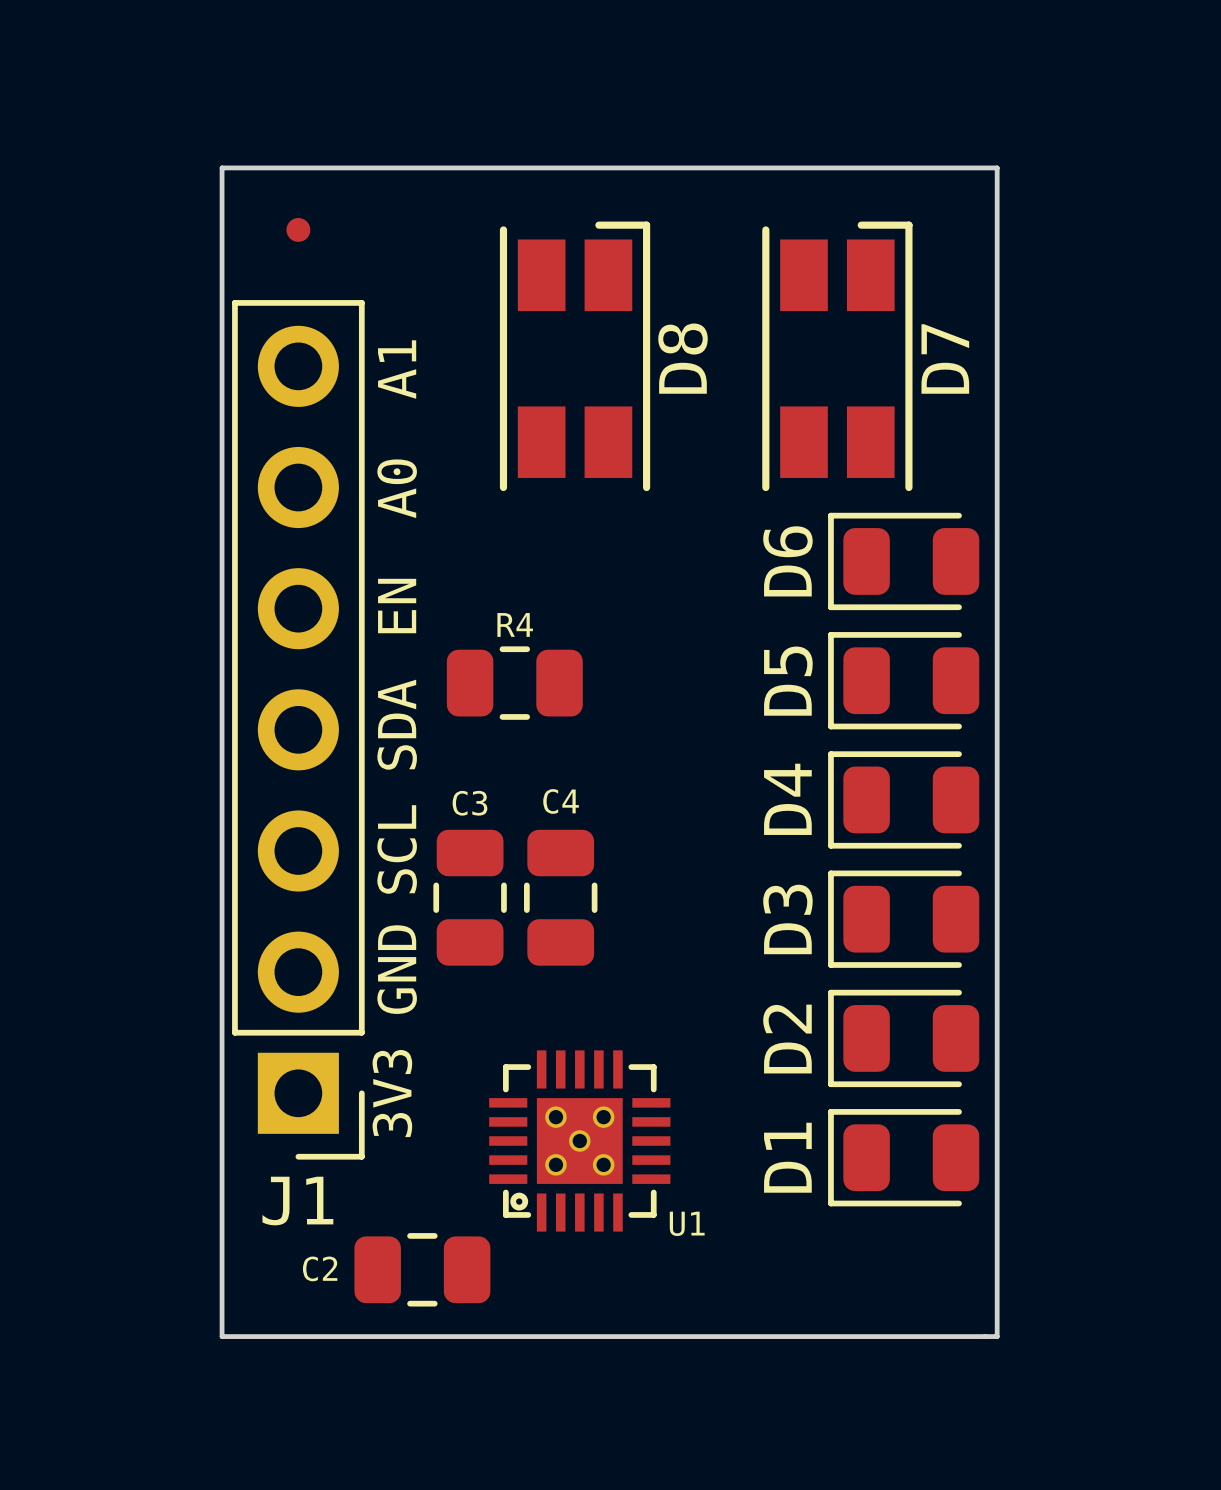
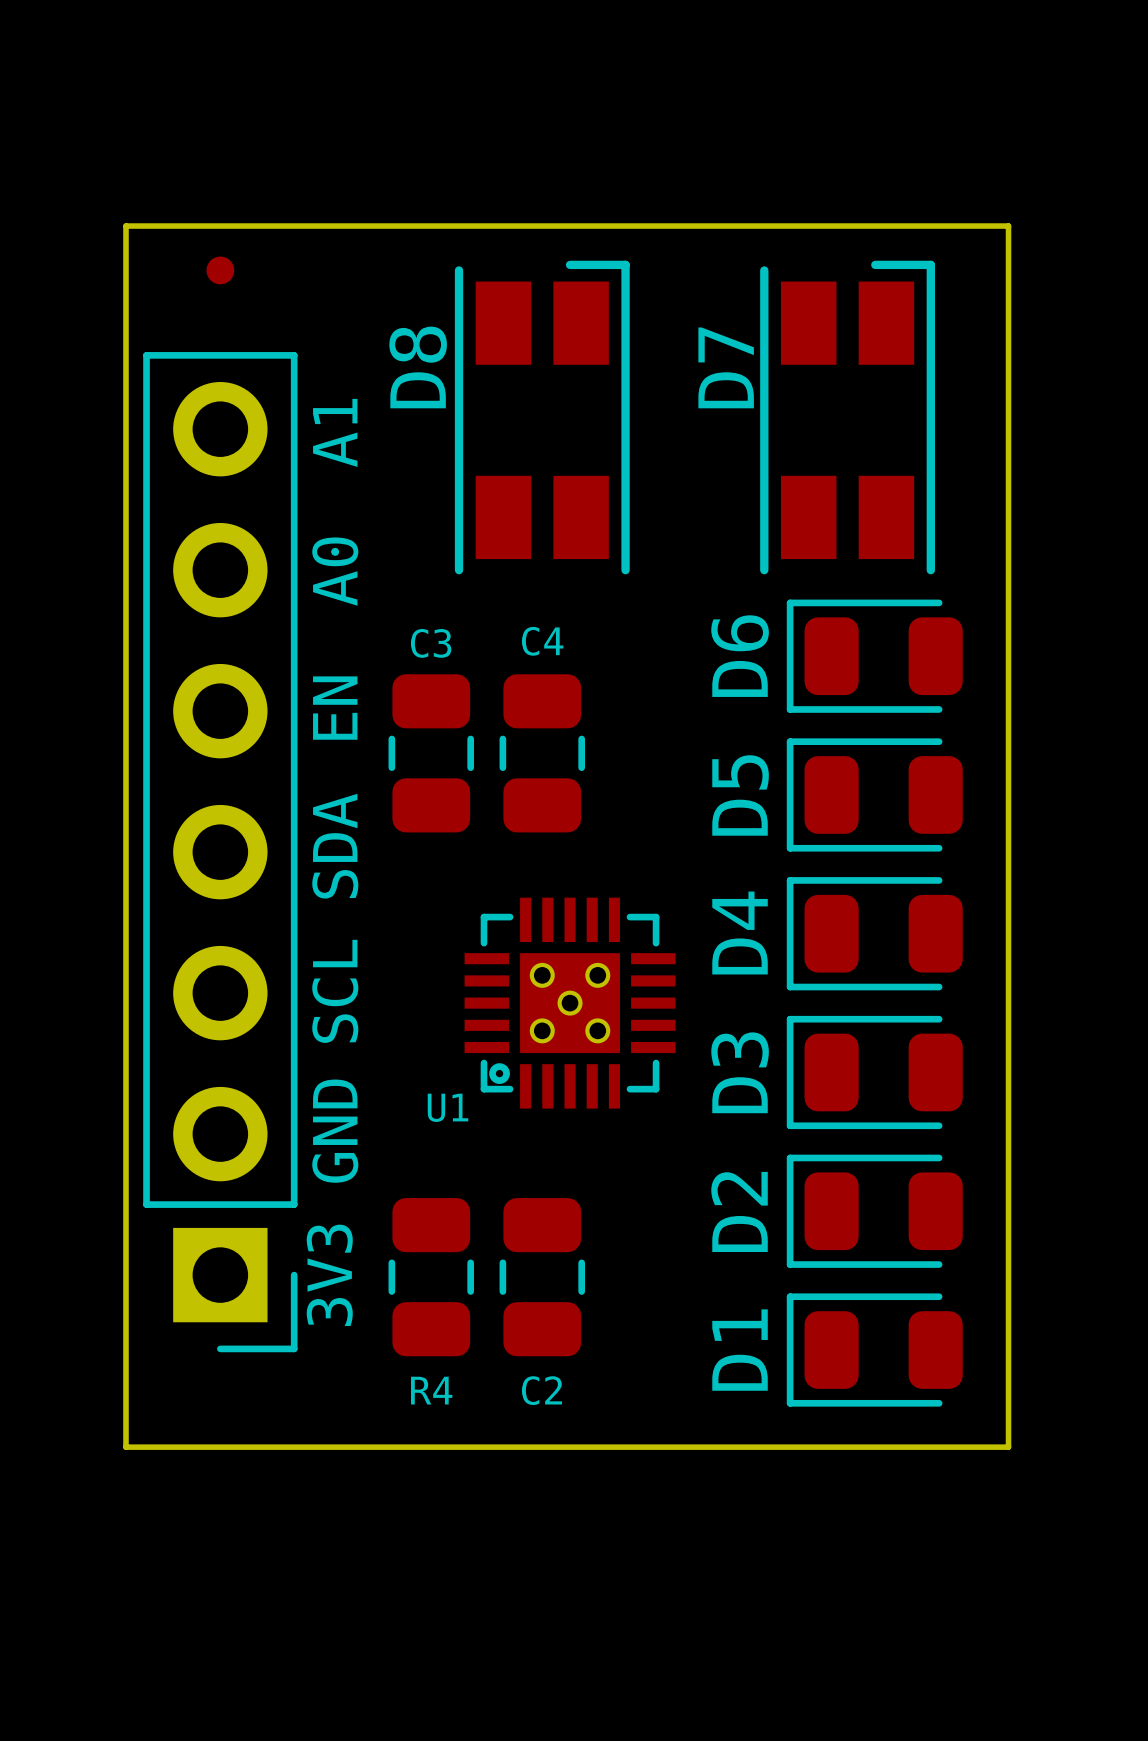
board edge: (222, 167) (222, 1336) (997, 1336) (997, 167) (222, 167) -> (125, 226) (125, 1447) (1008, 1447) (1008, 226) (125, 226)
D8 name position: D8 (683, 358) -> D8 (418, 367)
D7 name position: D7 (945, 359) -> D7 (726, 367)
D6 position: (903, 561) -> (874, 656)
R4 name position: R4 (515, 624) -> R4 (431, 1390)
D5 position: (903, 680) -> (874, 794)
R4 rotation: 0° (514, 683) -> 90° clockwise (431, 1277)
R4 position: (514, 683) -> (431, 1277)
D4 position: (903, 799) -> (874, 933)
C3 position: (470, 897) -> (431, 753)
C4 position: (560, 897) -> (542, 753)
D3 position: (903, 919) -> (874, 1072)
D2 position: (903, 1038) -> (874, 1211)
U1 position: (579, 1141) -> (570, 1003)
D1 position: (903, 1157) -> (874, 1350)
J1 name: J1 (297, 1201) -> none
U1 name position: U1 (687, 1223) -> U1 (447, 1107)
C2 name position: C2 (320, 1268) -> C2 (541, 1390)
C2 rotation: 0° (422, 1269) -> 90° clockwise (542, 1277)
C2 position: (422, 1269) -> (542, 1277)

